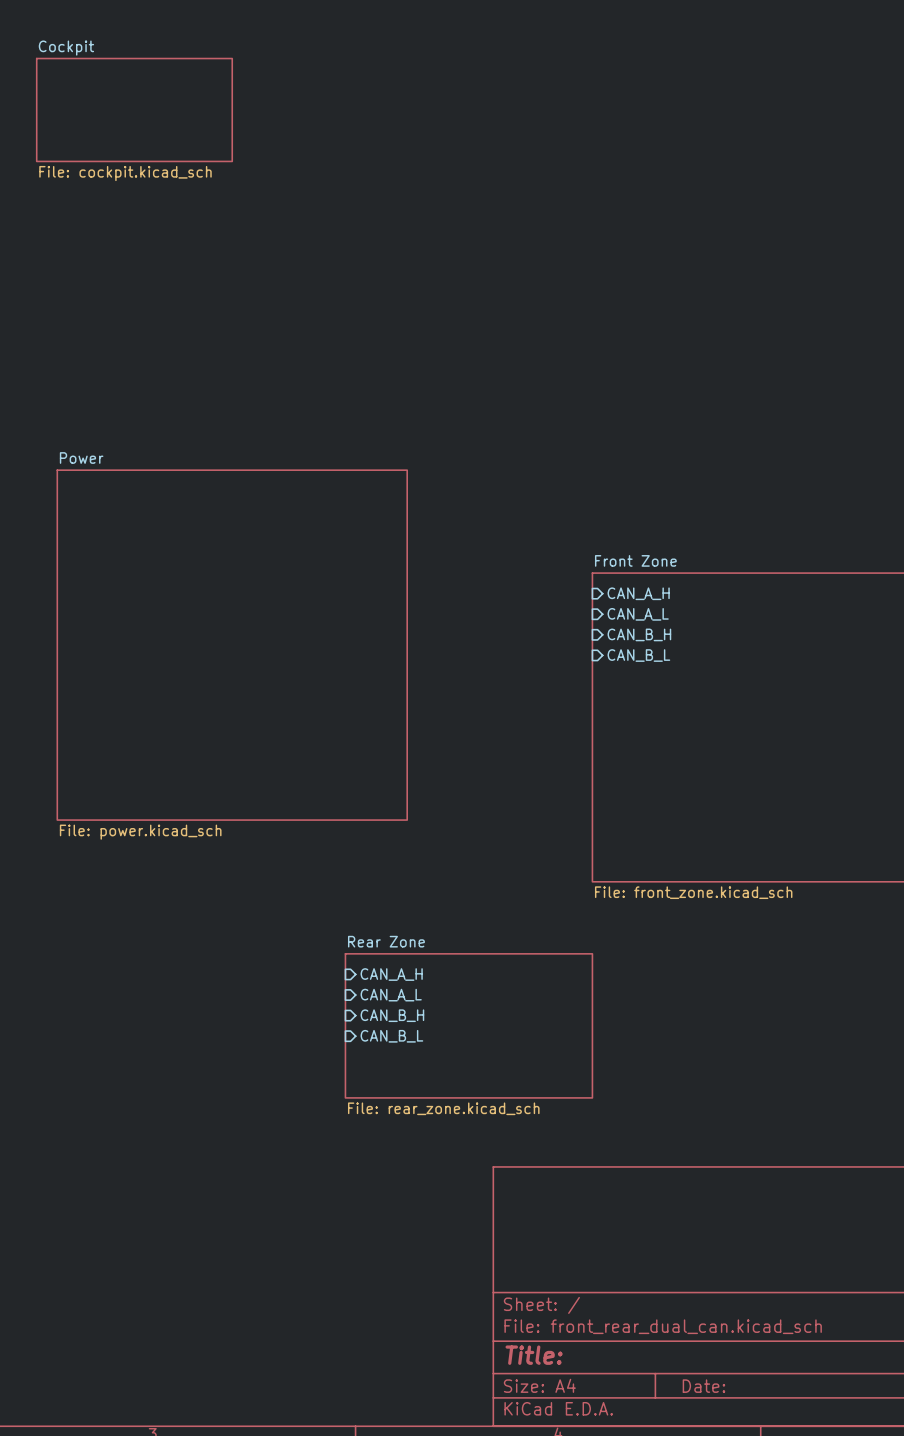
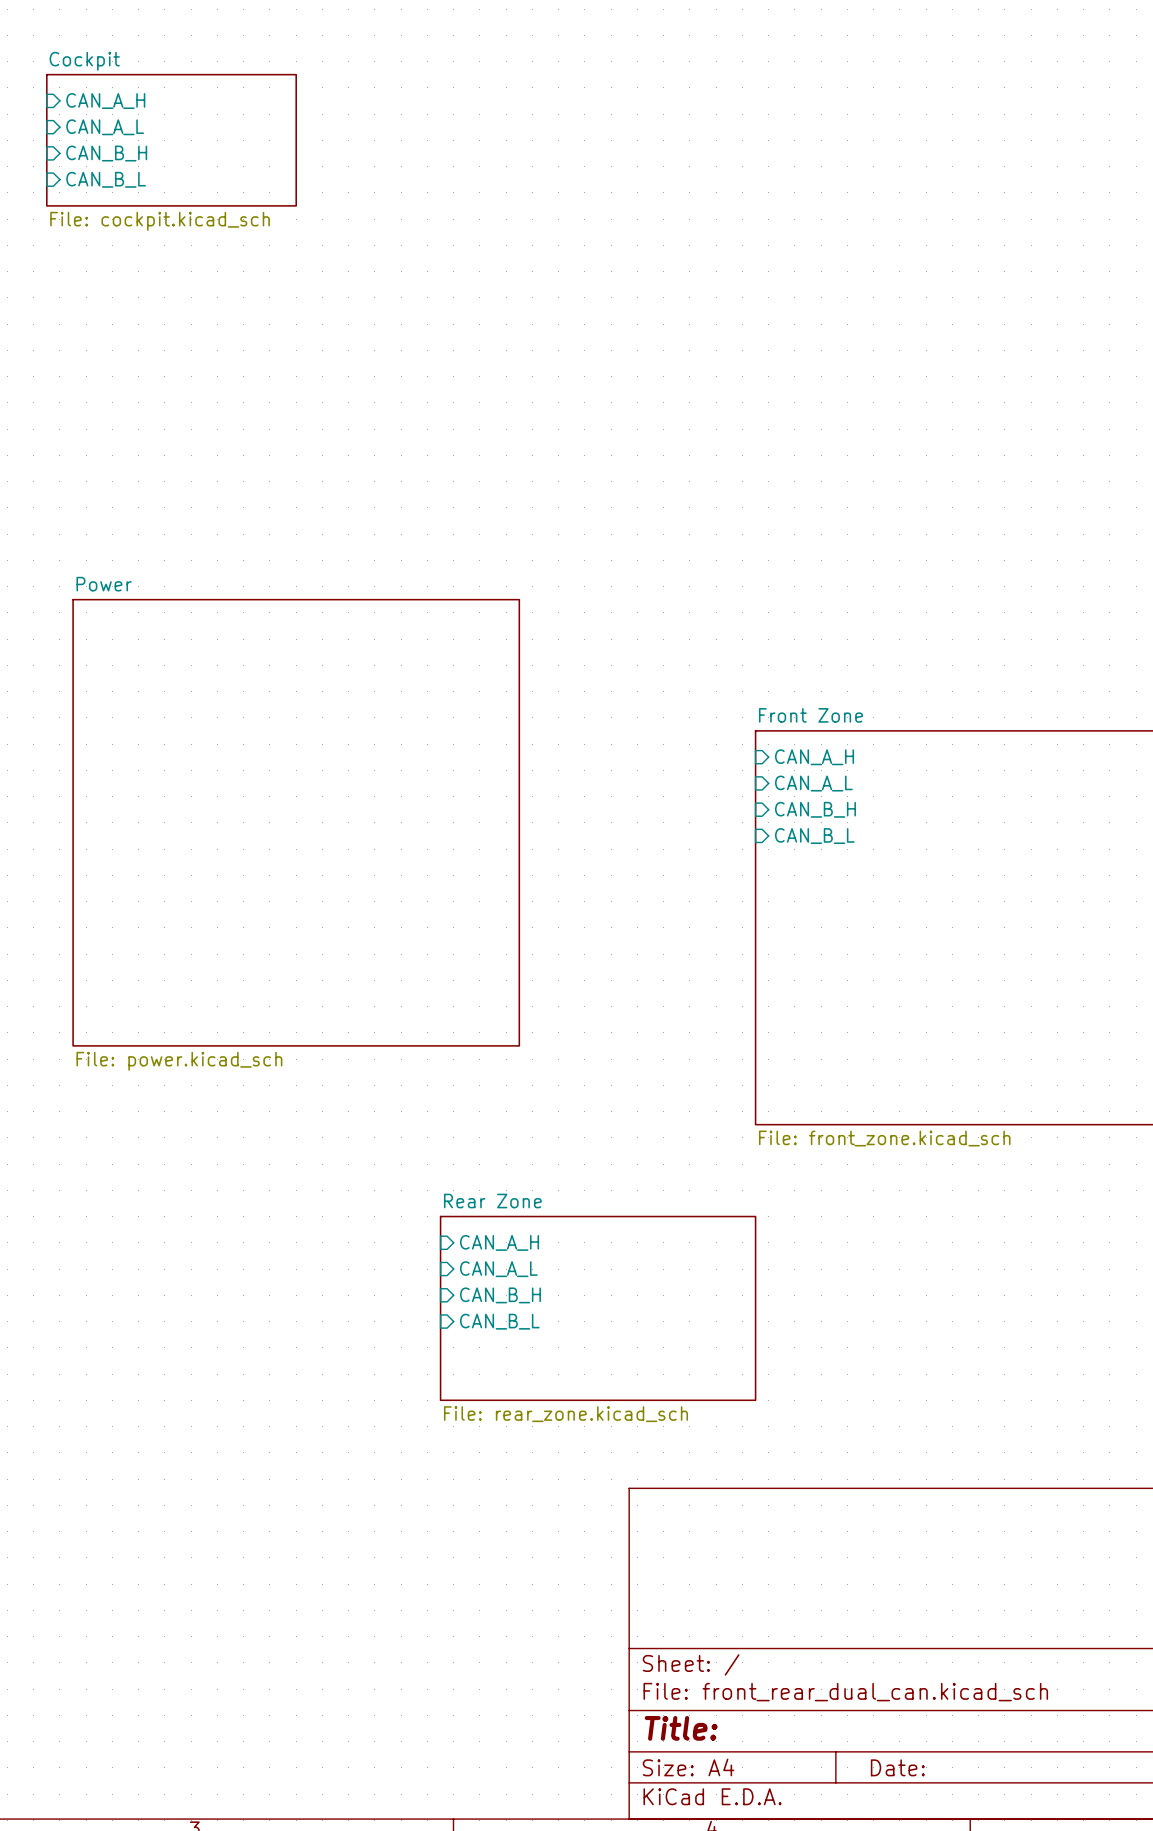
sheet pin: none -> CAN_A_H (105, 101)
sheet pin: none -> CAN_A_L (105, 127)
sheet pin: none -> CAN_B_H (106, 153)
sheet pin: none -> CAN_B_L (106, 179)

